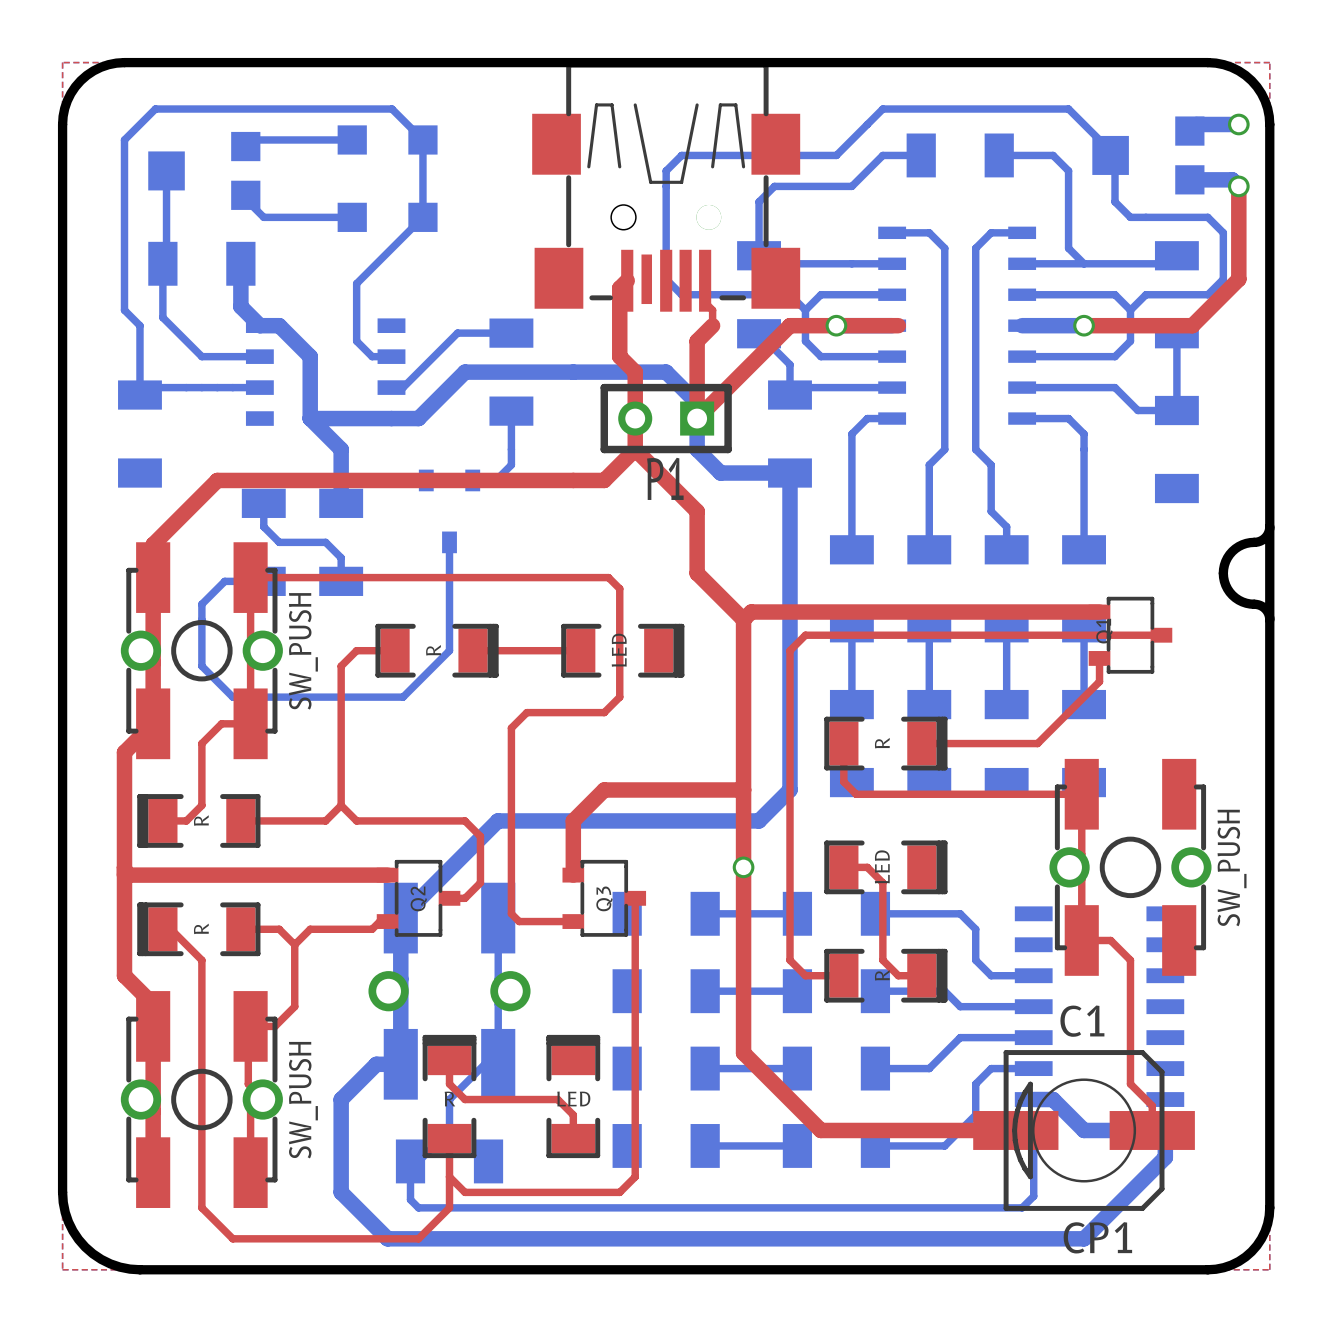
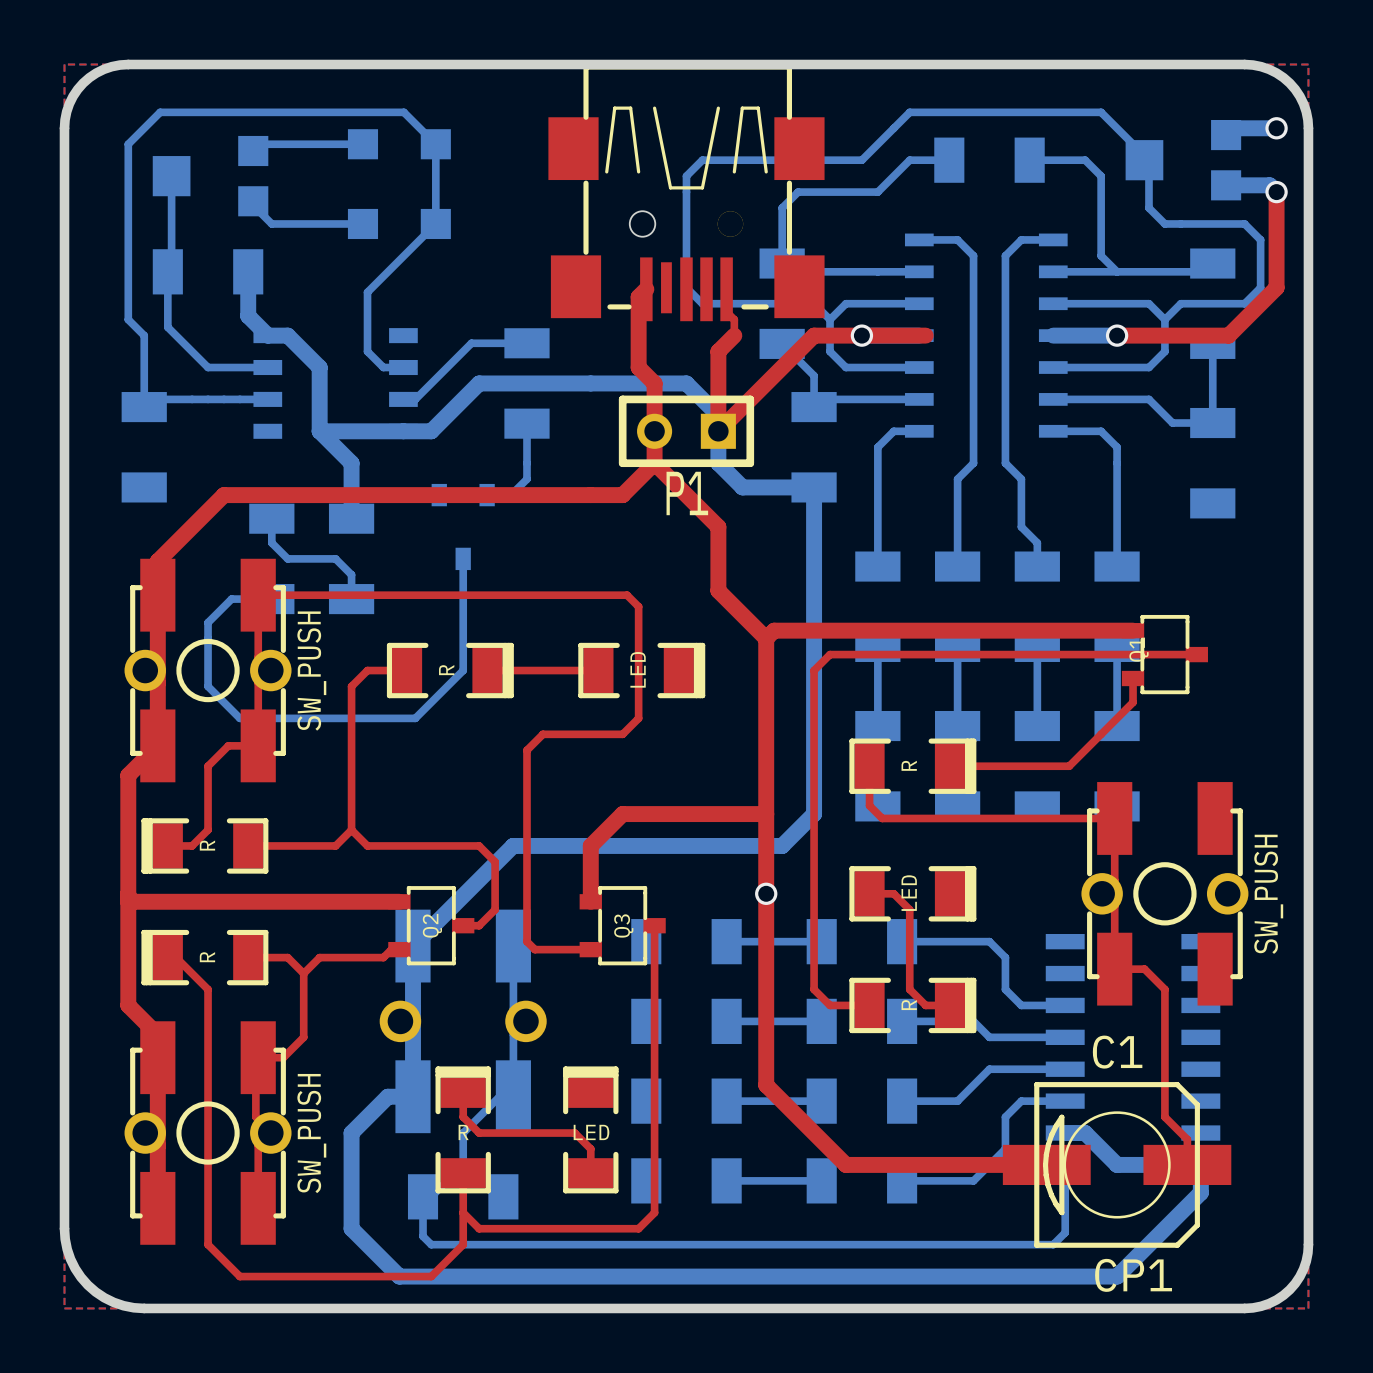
board edge: (1269, 526) (1267, 534) (1262, 540) (1242, 544) (1232, 551) (1225, 561) (1223, 573) (1225, 585) (1232, 595) (1242, 601) (1262, 606) (1267, 612) (1269, 619) -> none

